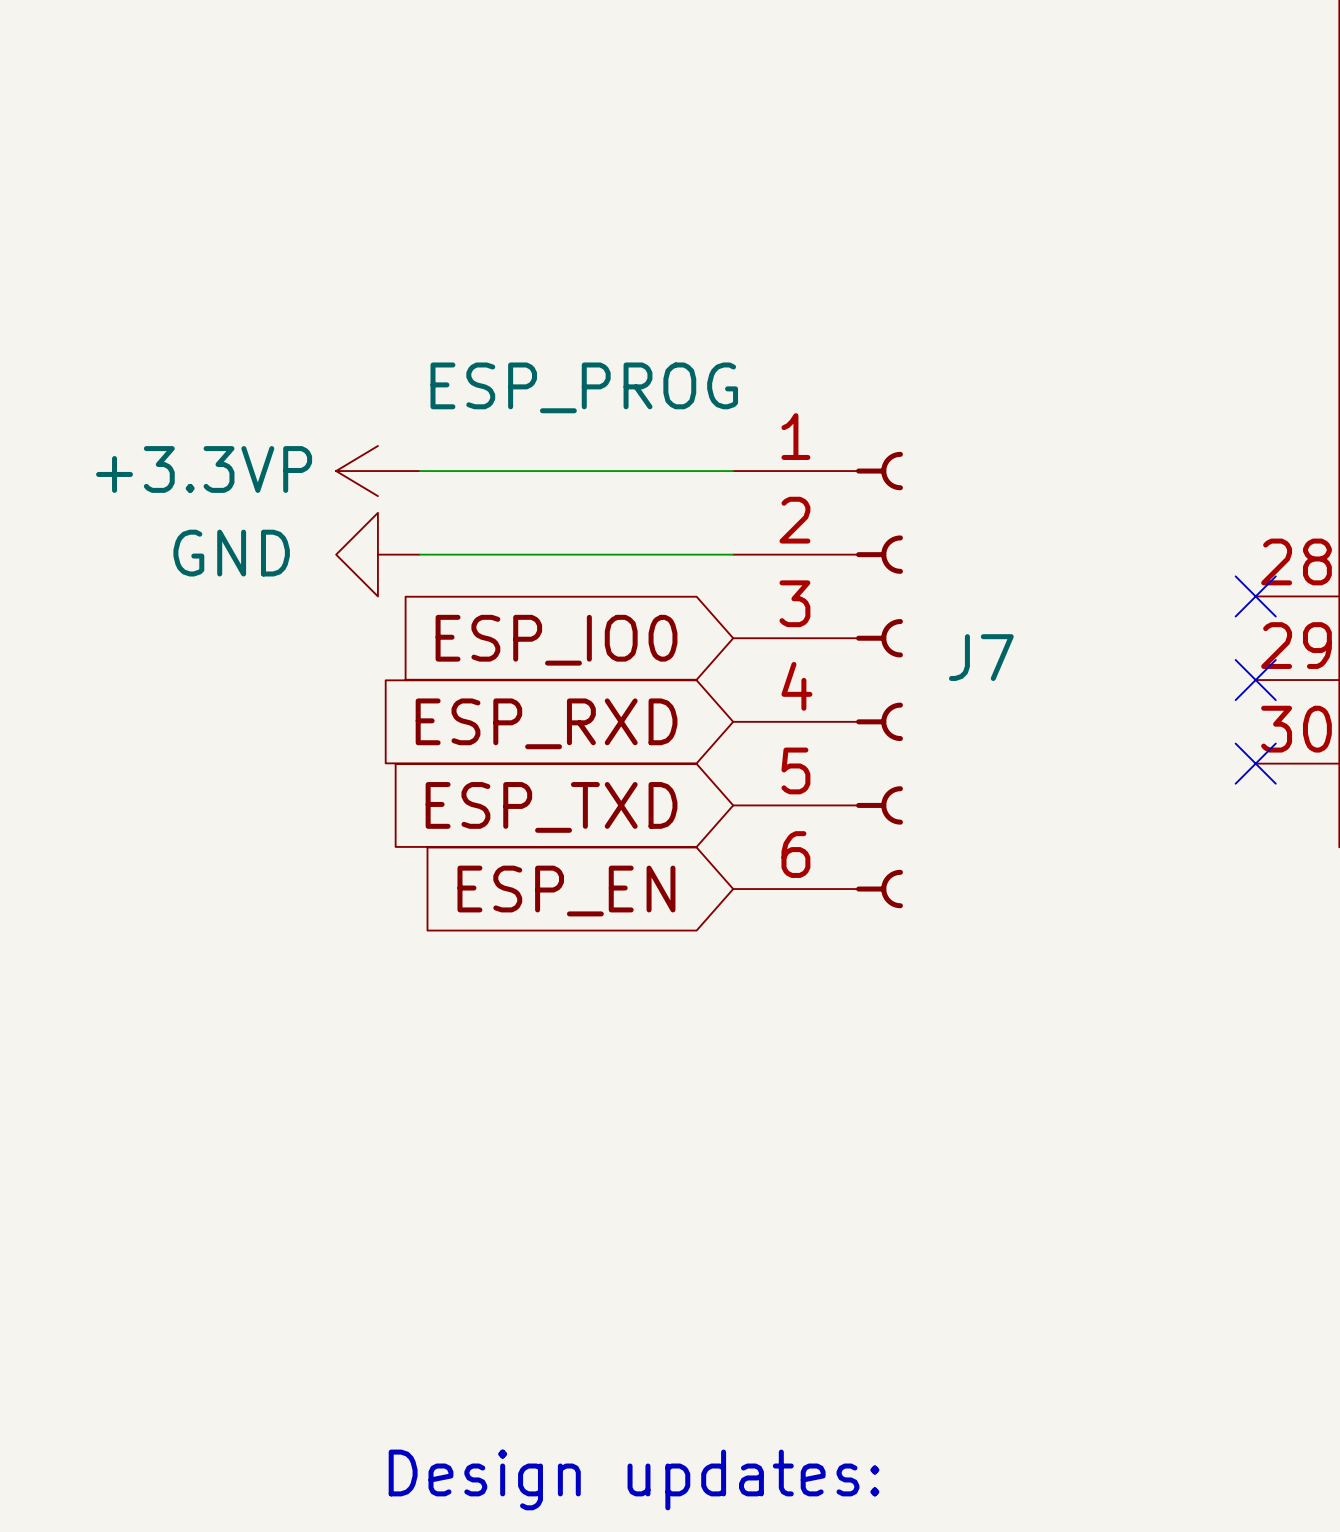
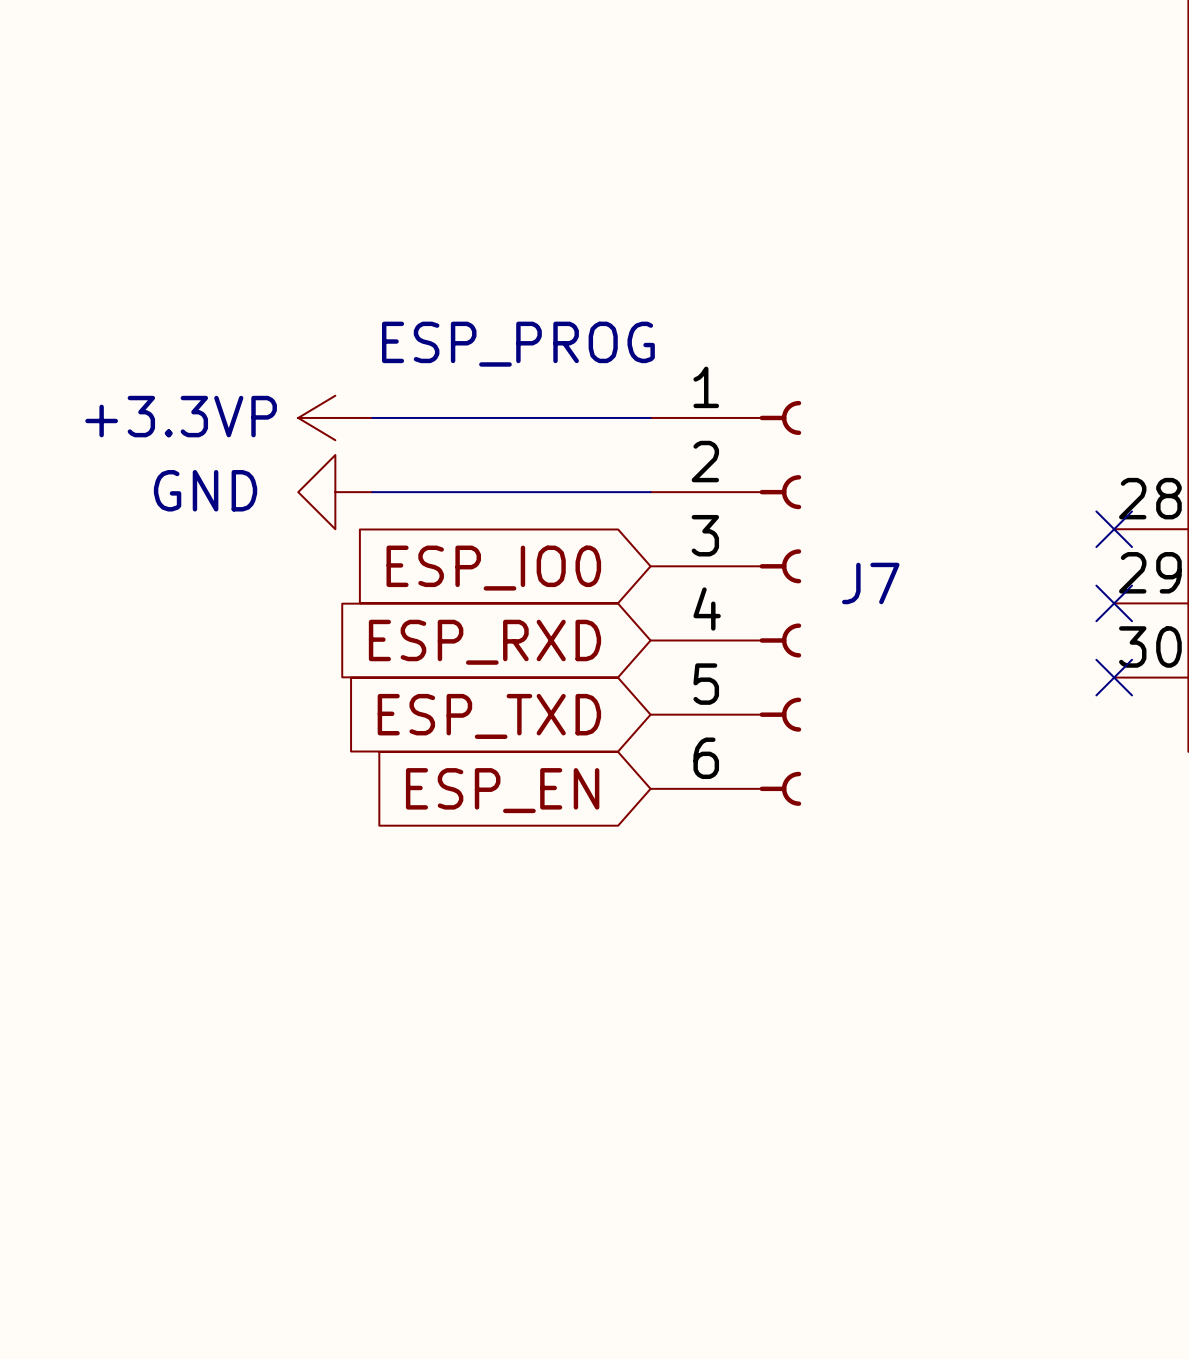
text: Design updates: (634, 1479) -> none

